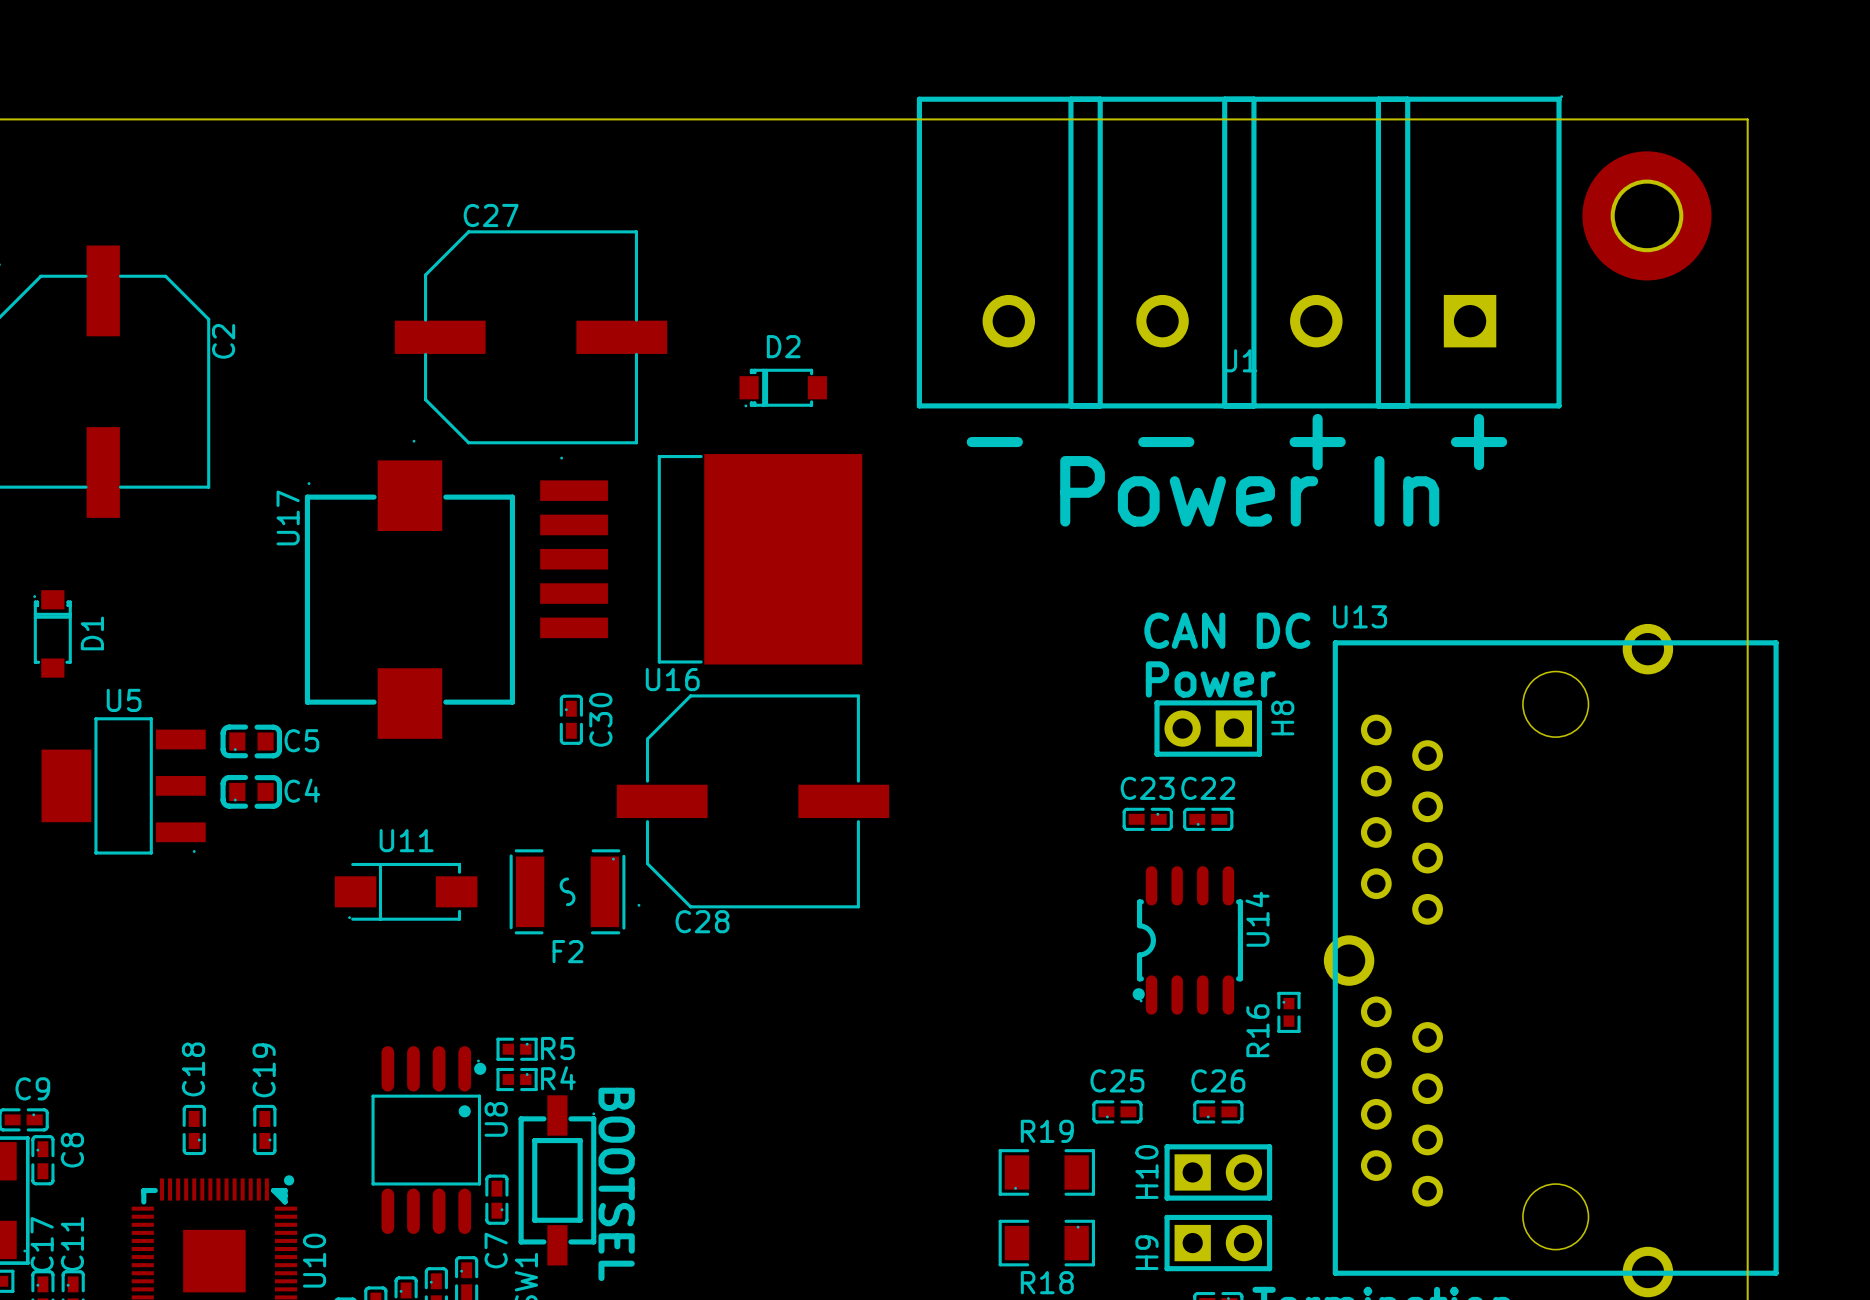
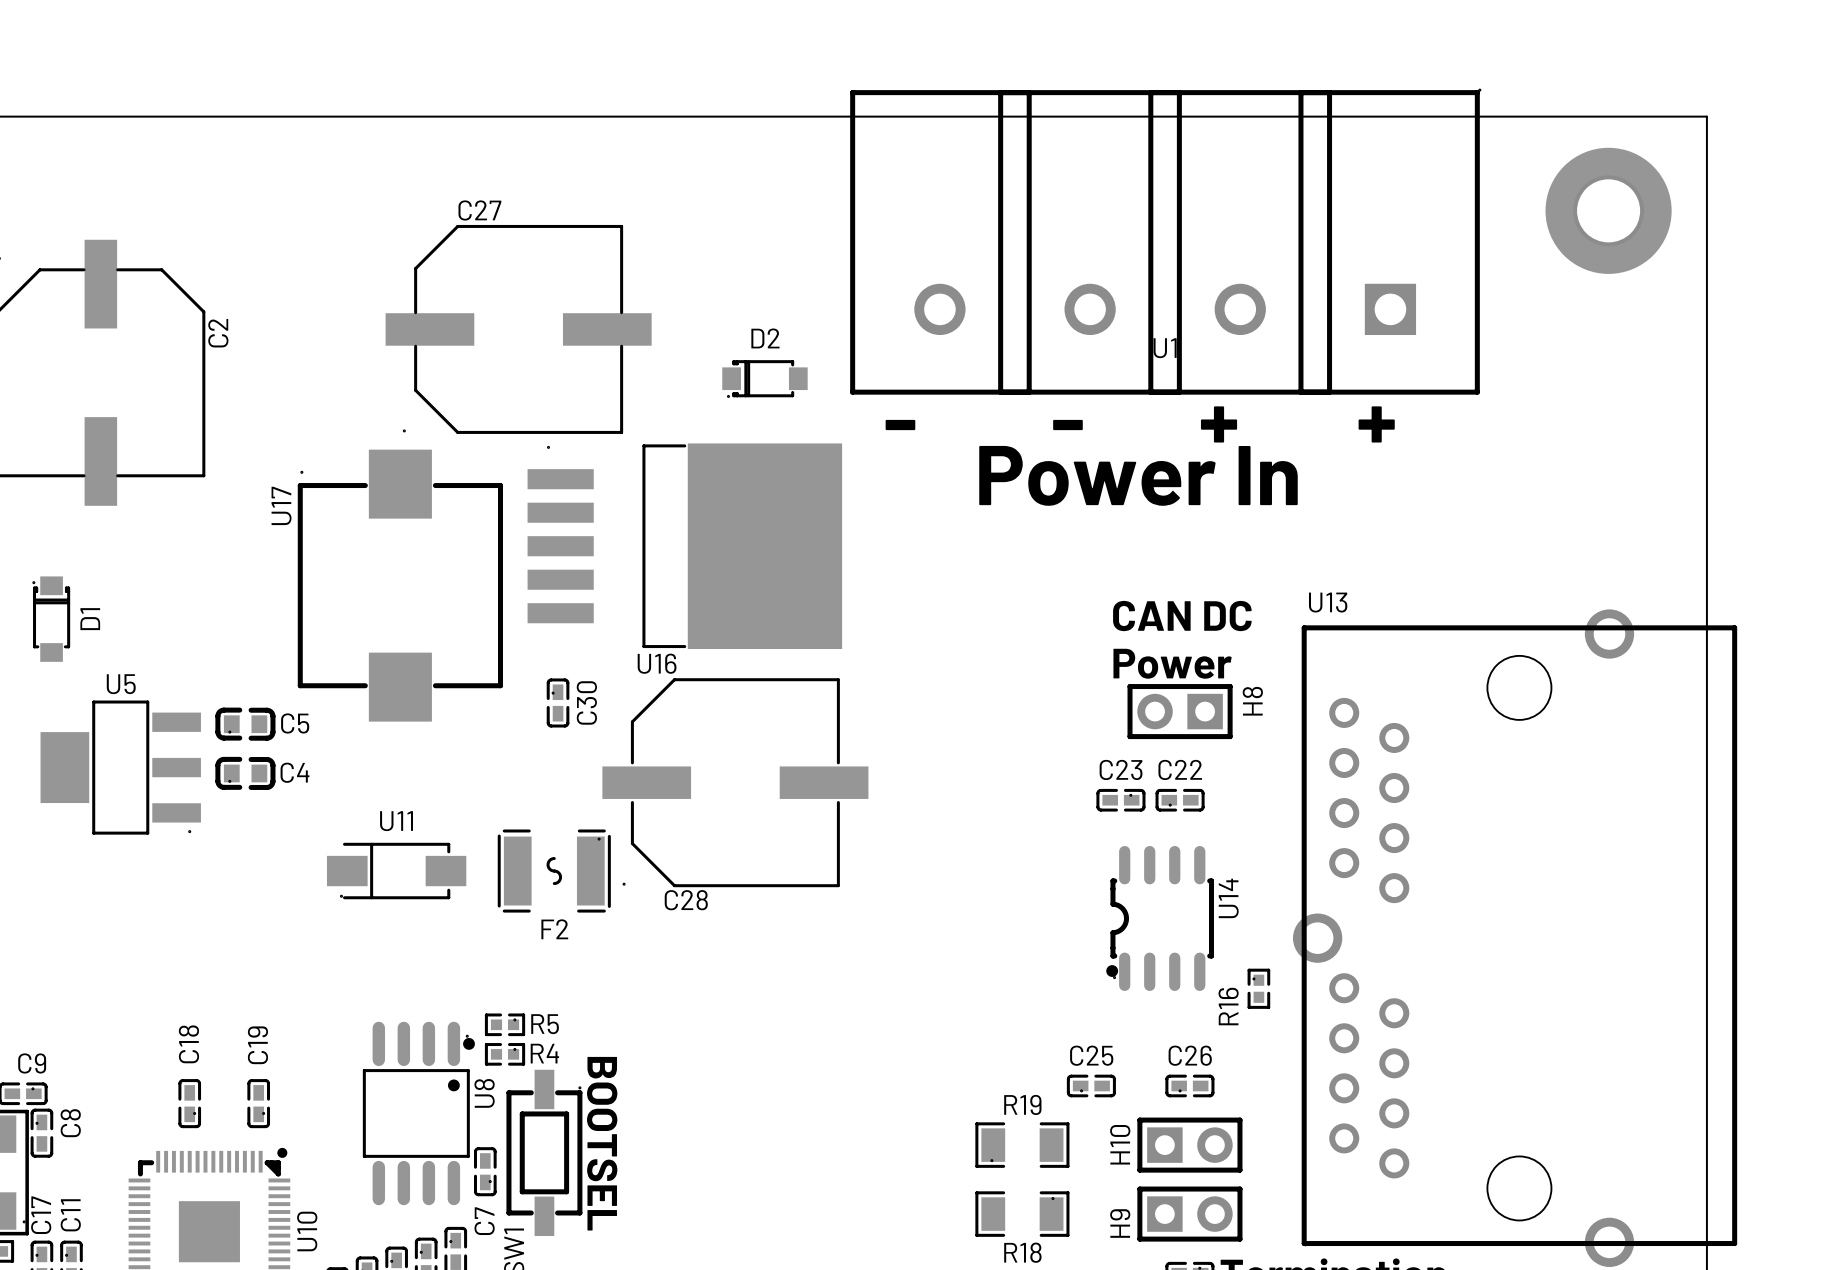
U1 position: (1239, 251) -> (1165, 241)
text position: - (994, 442) -> - (900, 425)
text position: - (1166, 442) -> - (1067, 425)
text position: + (1317, 442) -> + (1219, 424)
text position: + (1479, 442) -> + (1376, 424)
text position: Power In (1249, 491) -> Power In (1138, 475)

